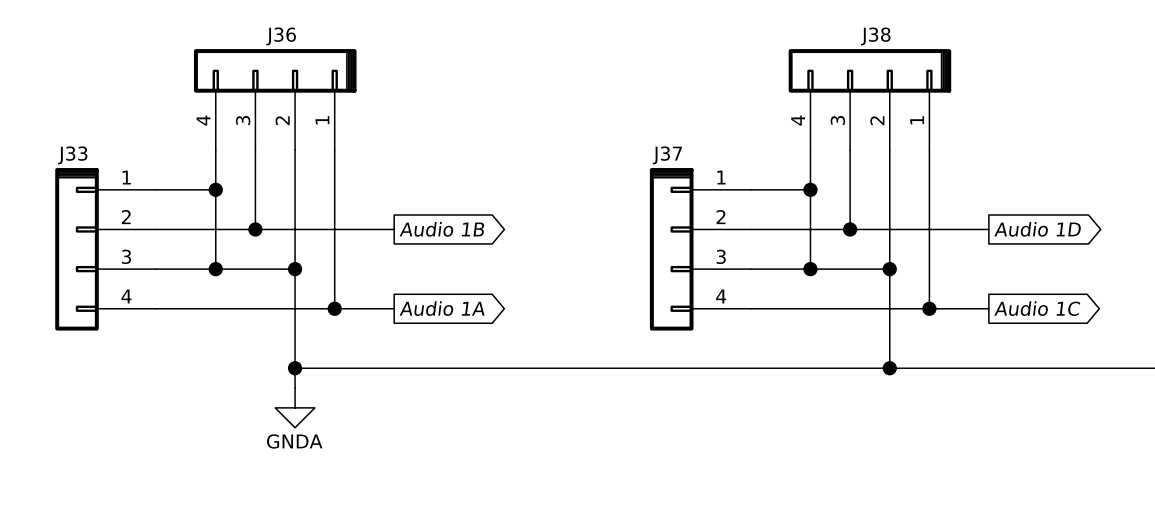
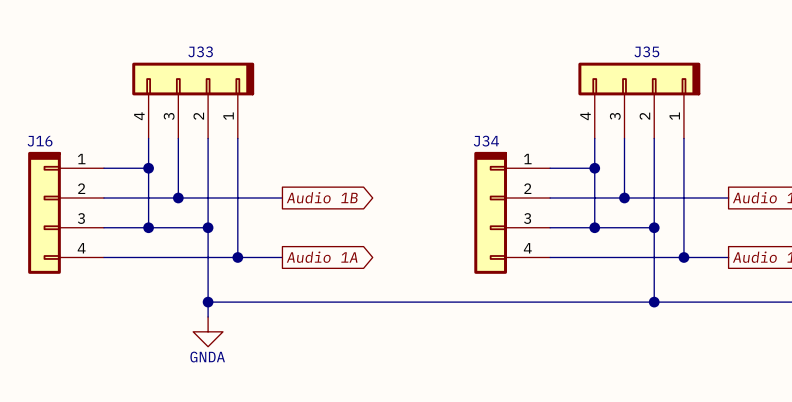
J36 name: J36 (281, 36) -> J33 (200, 51)
J38 name: J38 (875, 36) -> J35 (646, 51)
J33 name: J33 (72, 155) -> J16 (40, 141)
J37 name: J37 (667, 155) -> J34 (486, 141)

